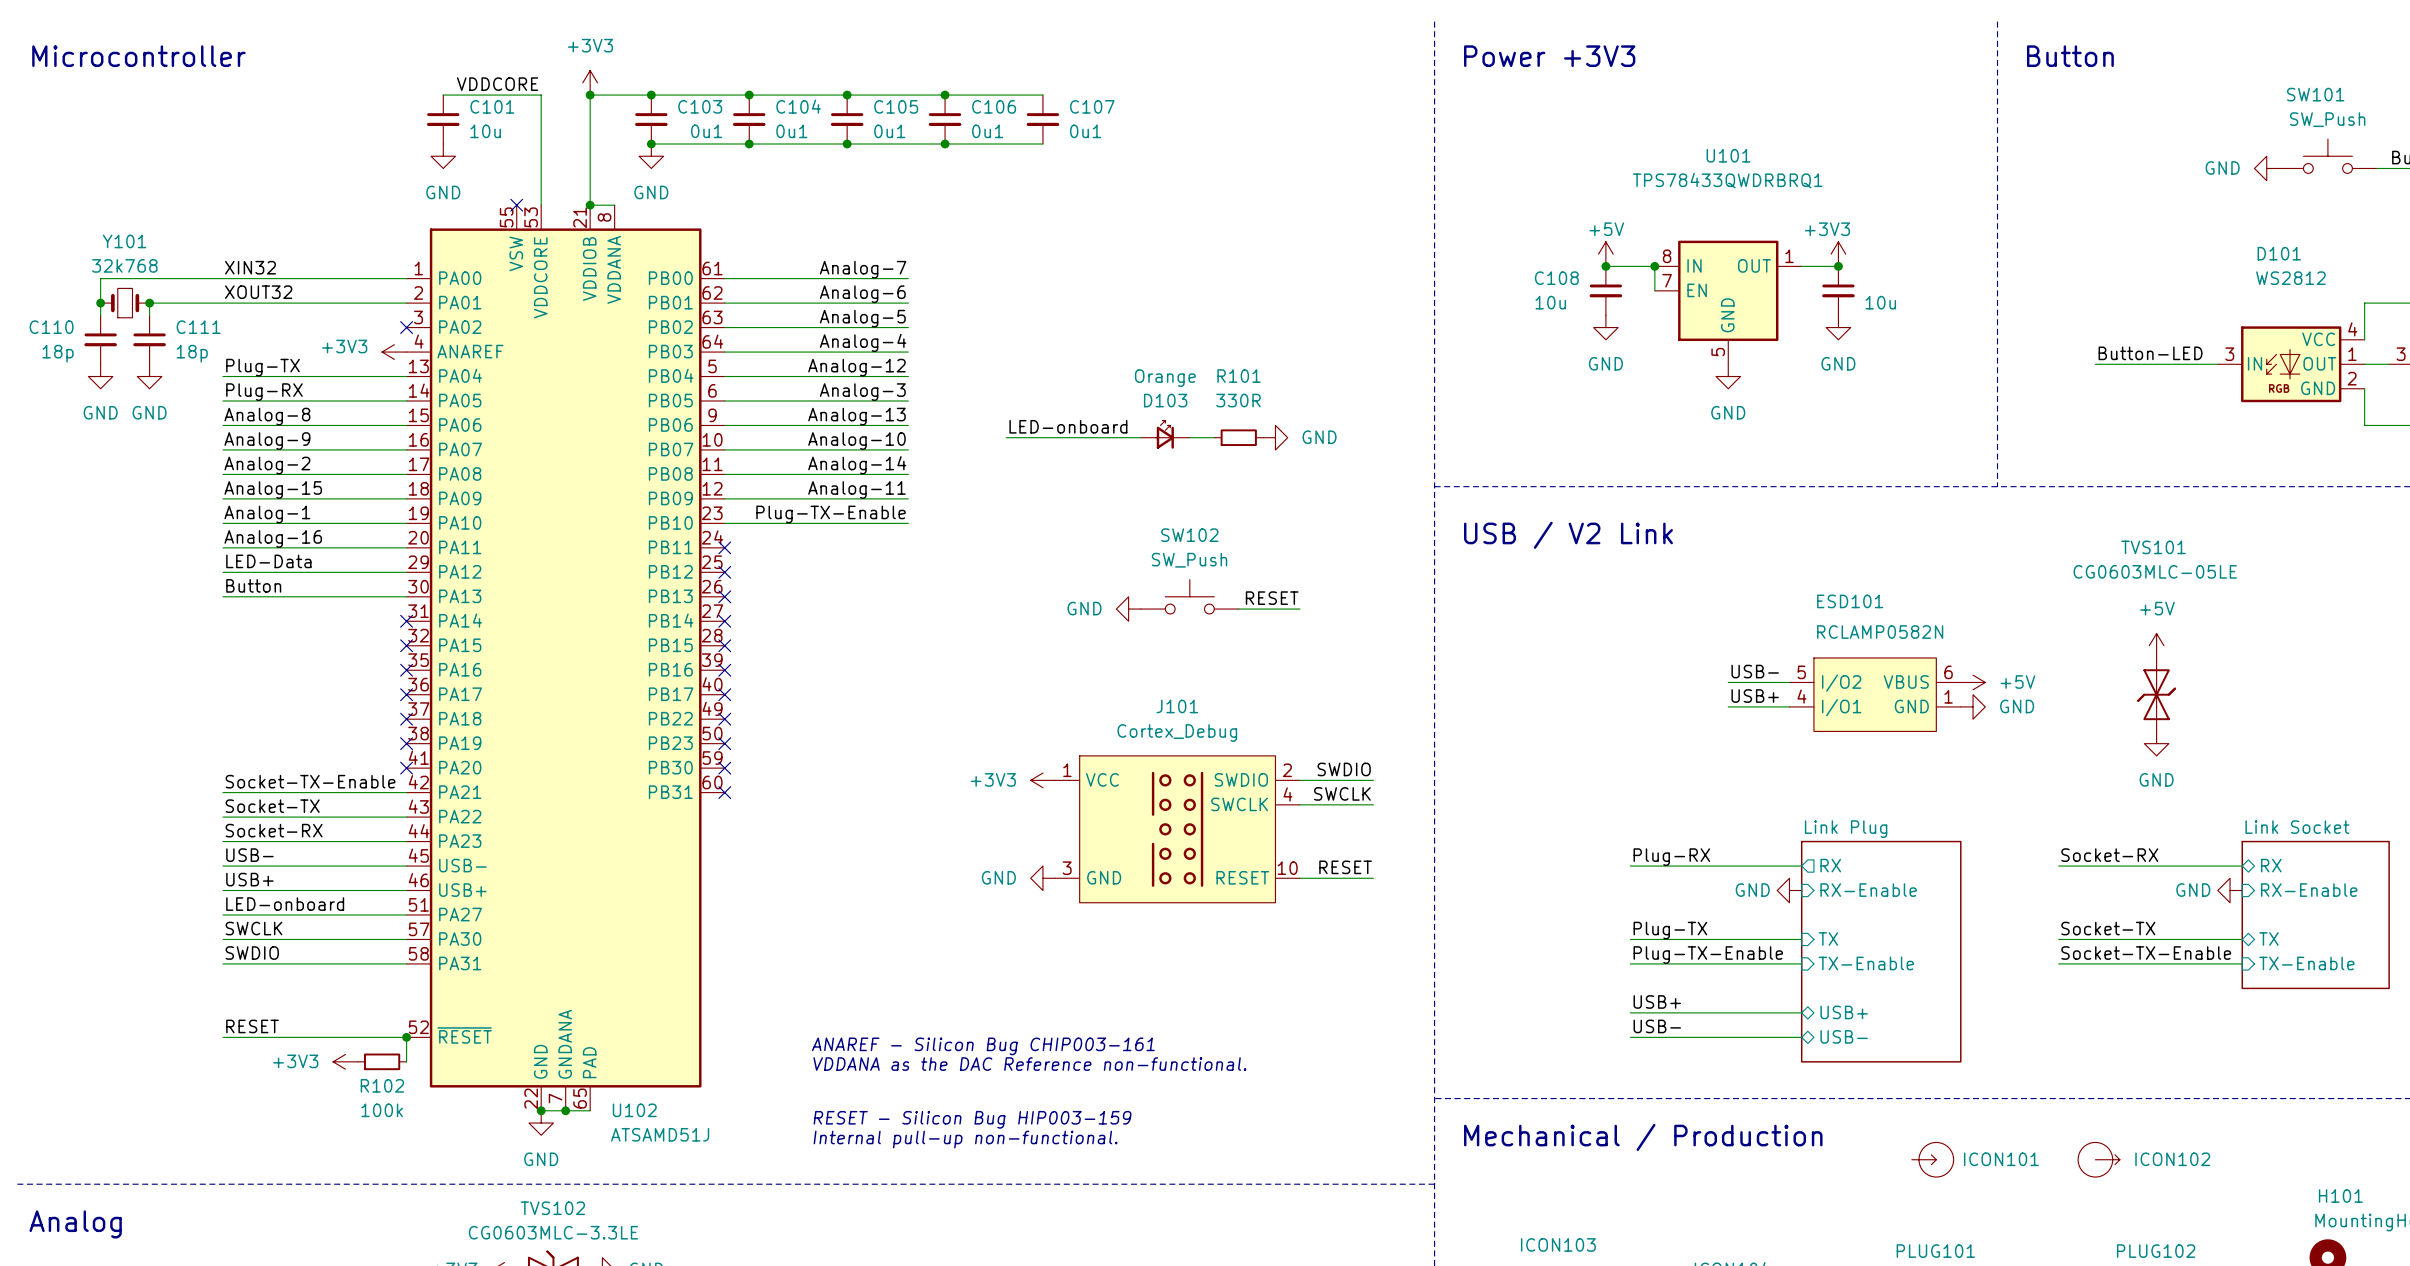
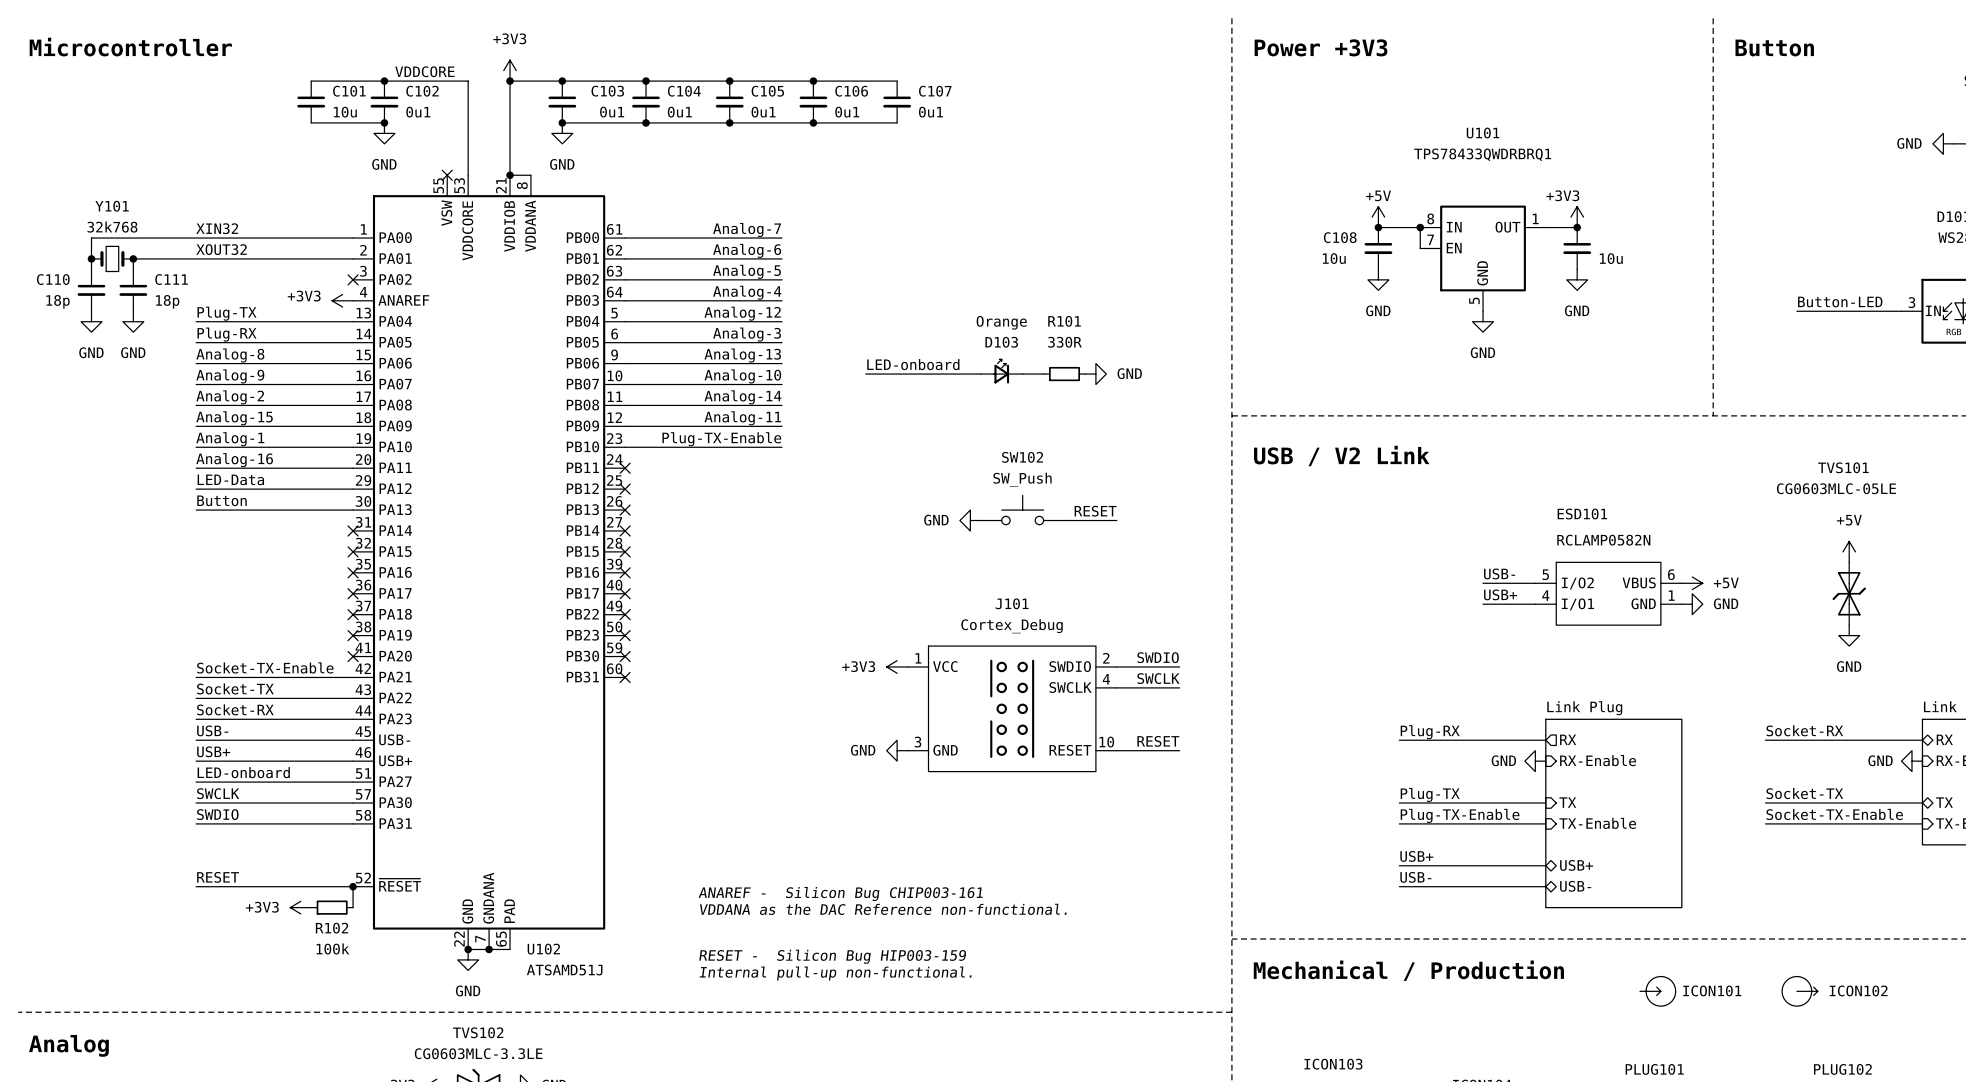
wire: none -> (311, 81) (384, 81)
junction: none -> (384, 81)
C101 name: C101 (492, 106) -> C102 (422, 91)
C101: none -> 10u (311, 102)
C101 value: 10u (485, 131) -> 0u1 (418, 112)
wire: none -> (311, 122) (384, 122)
junction: none -> (384, 122)

